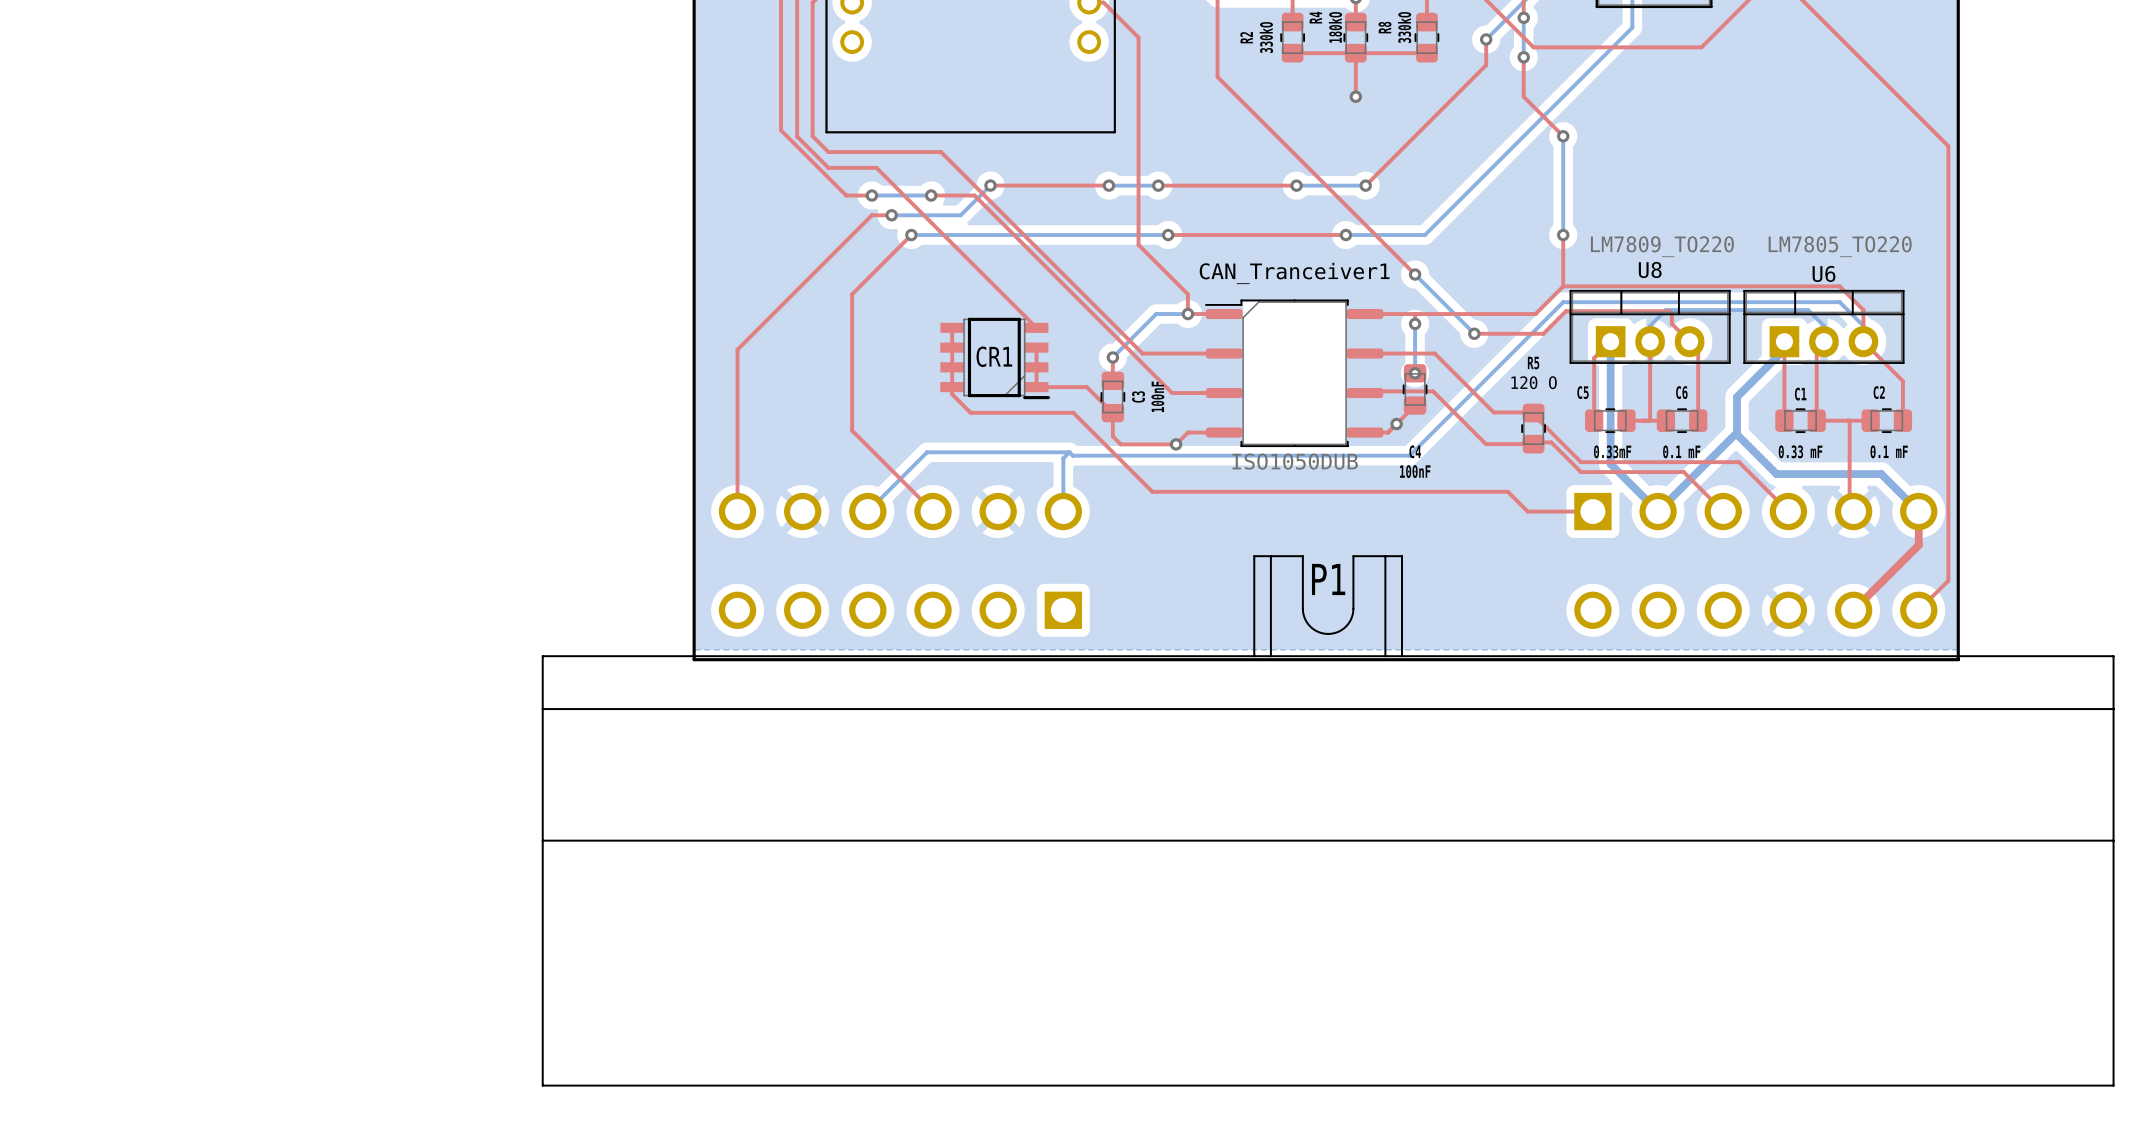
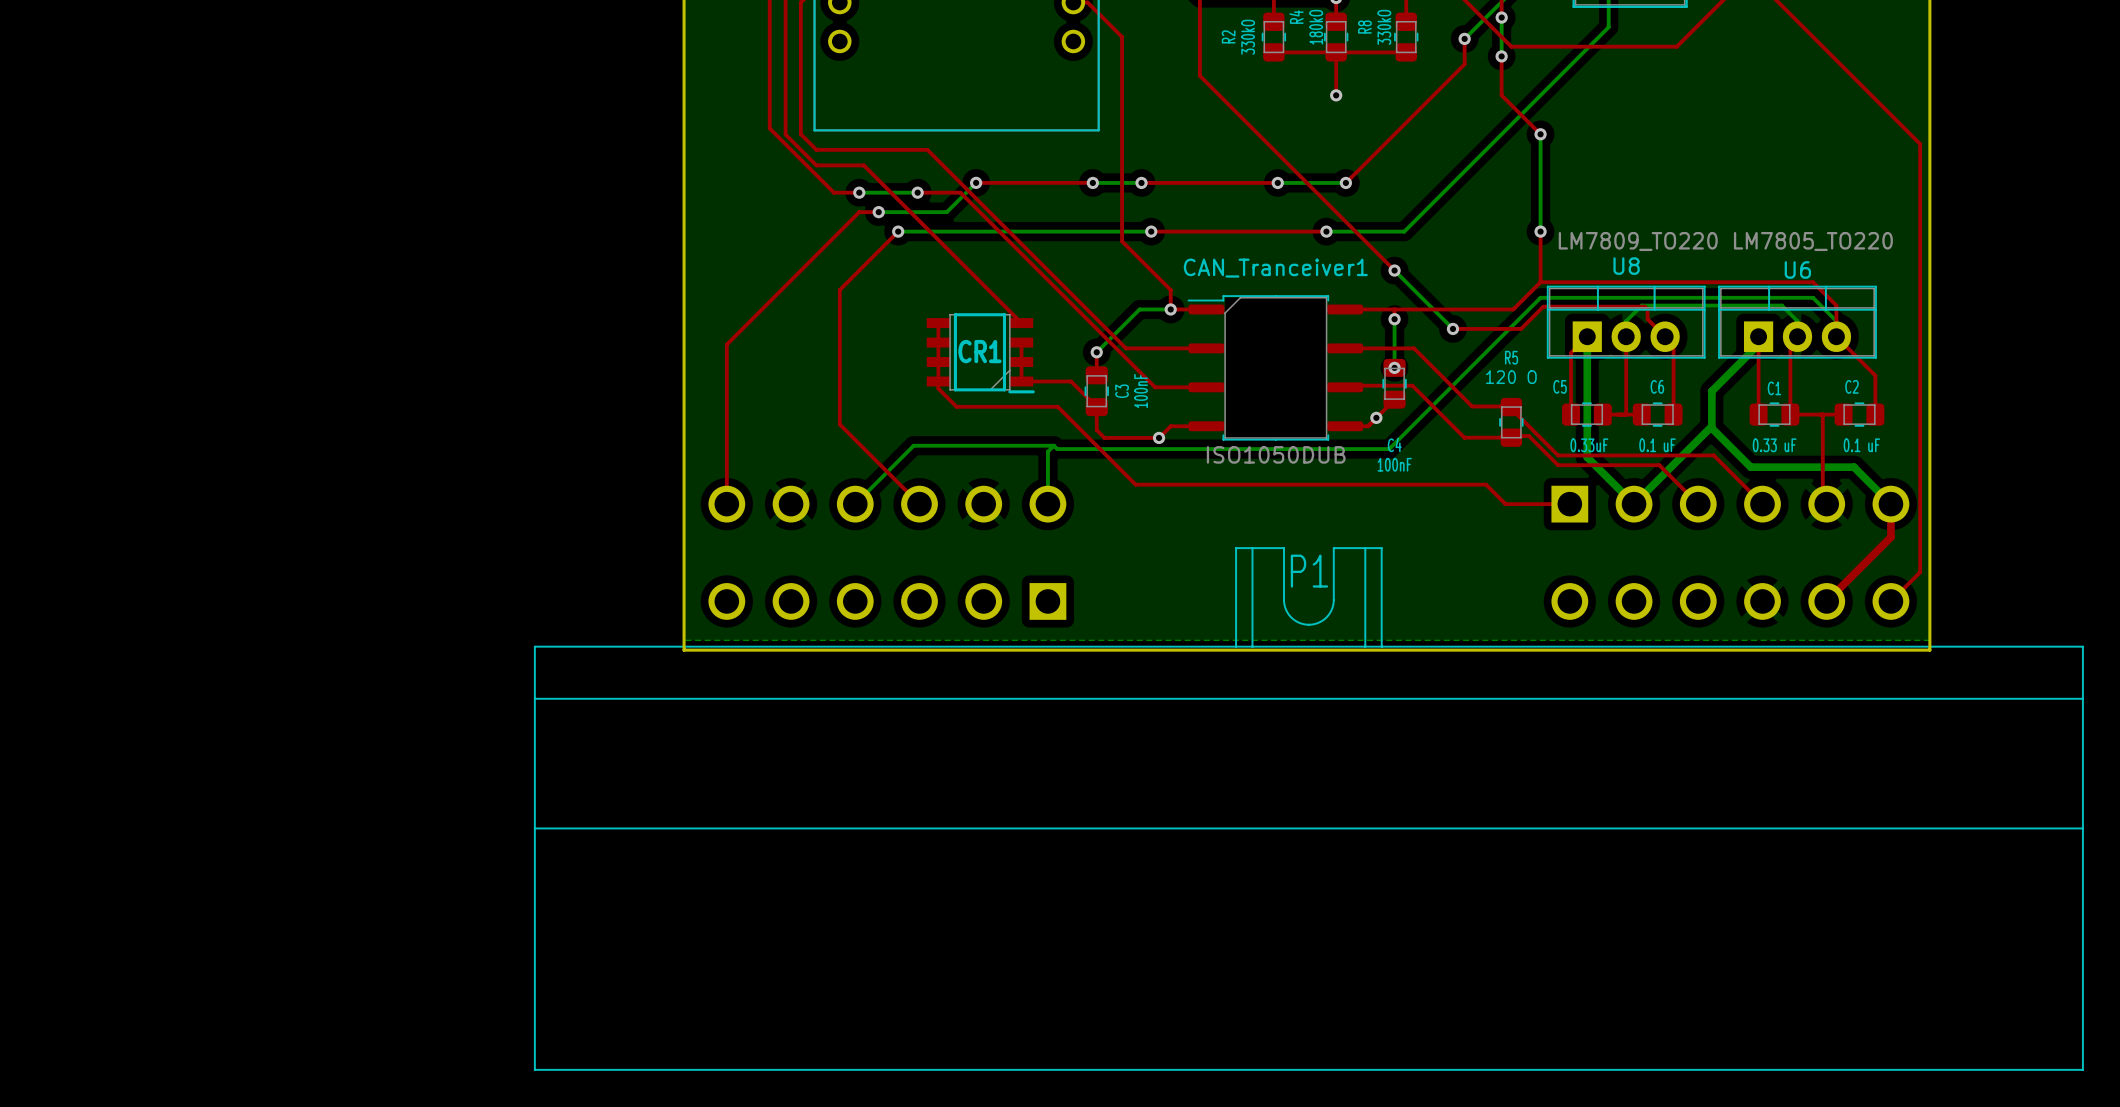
C5 value: 0.33mF (1612, 451) -> 0.33uF (1589, 445)
C6 value: 0.1 mF (1681, 451) -> 0.1 uF (1657, 445)
C1 value: 0.33 mF (1800, 451) -> 0.33 uF (1774, 445)
C2 value: 0.1 mF (1889, 451) -> 0.1 uF (1861, 445)

